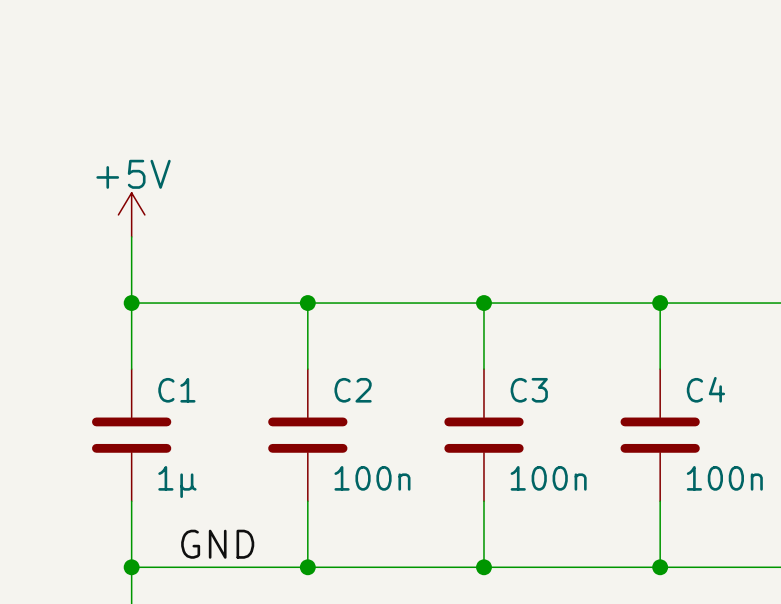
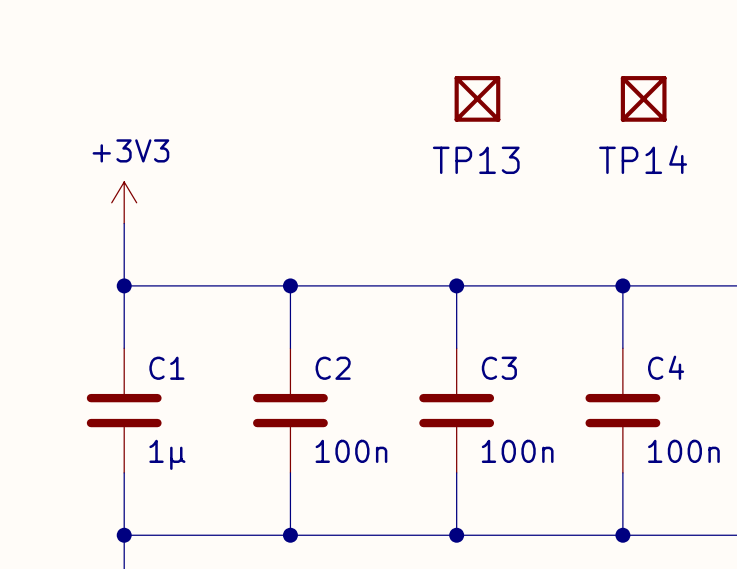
TP13: none -> (477, 98)
TP14: none -> (643, 98)
power symbol: +5V (131, 214) -> +3V3 (124, 202)
label: GND (217, 544) -> none

